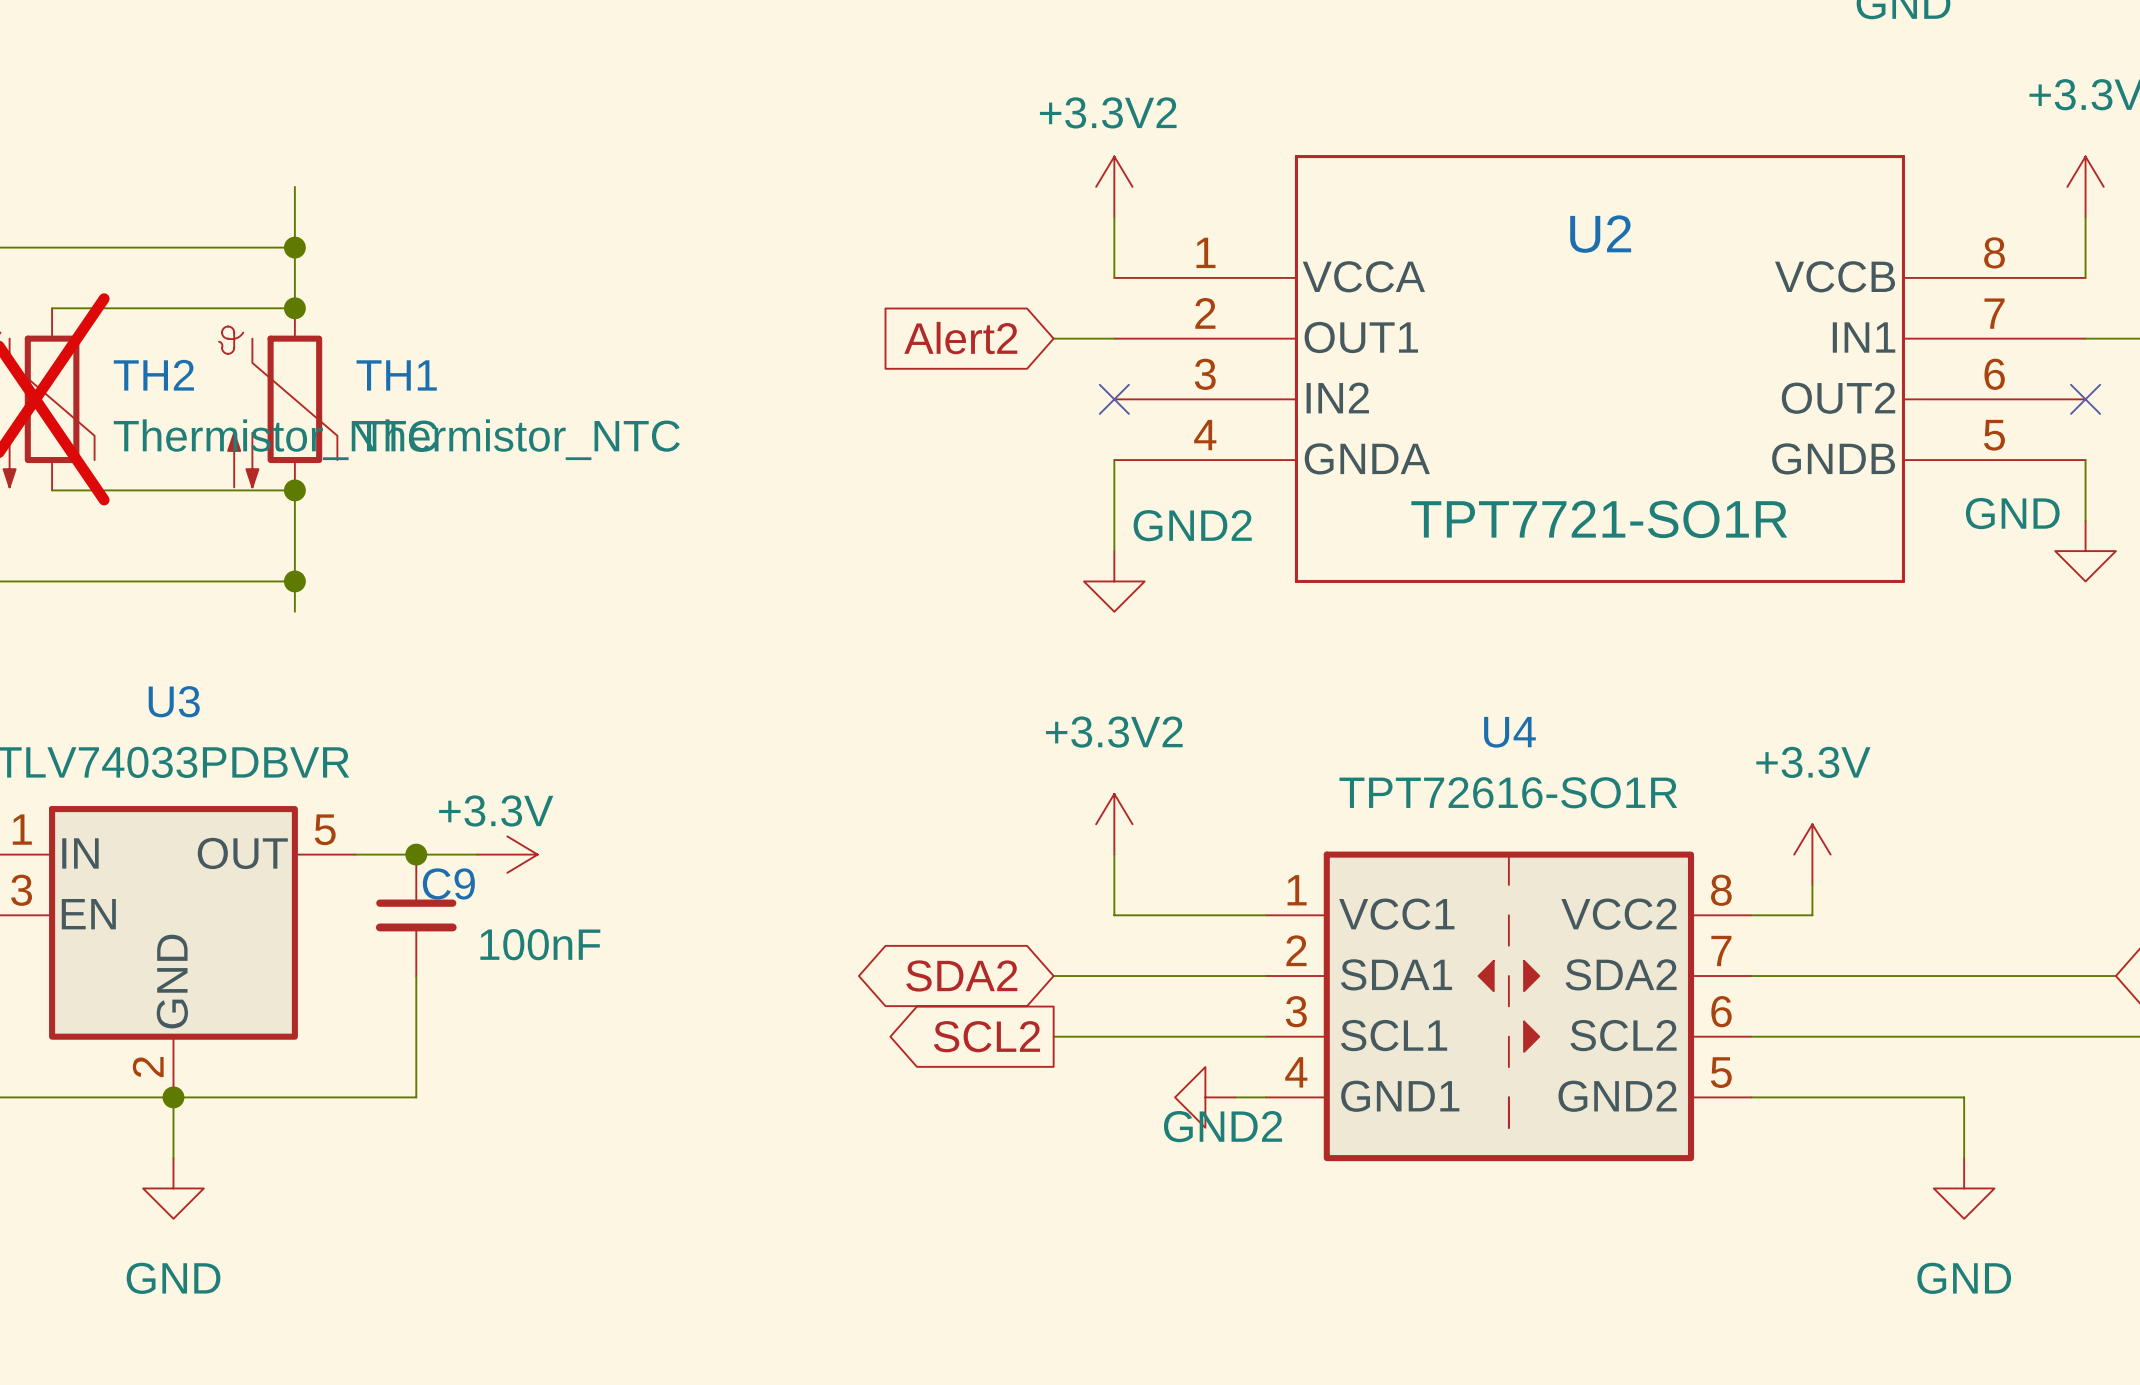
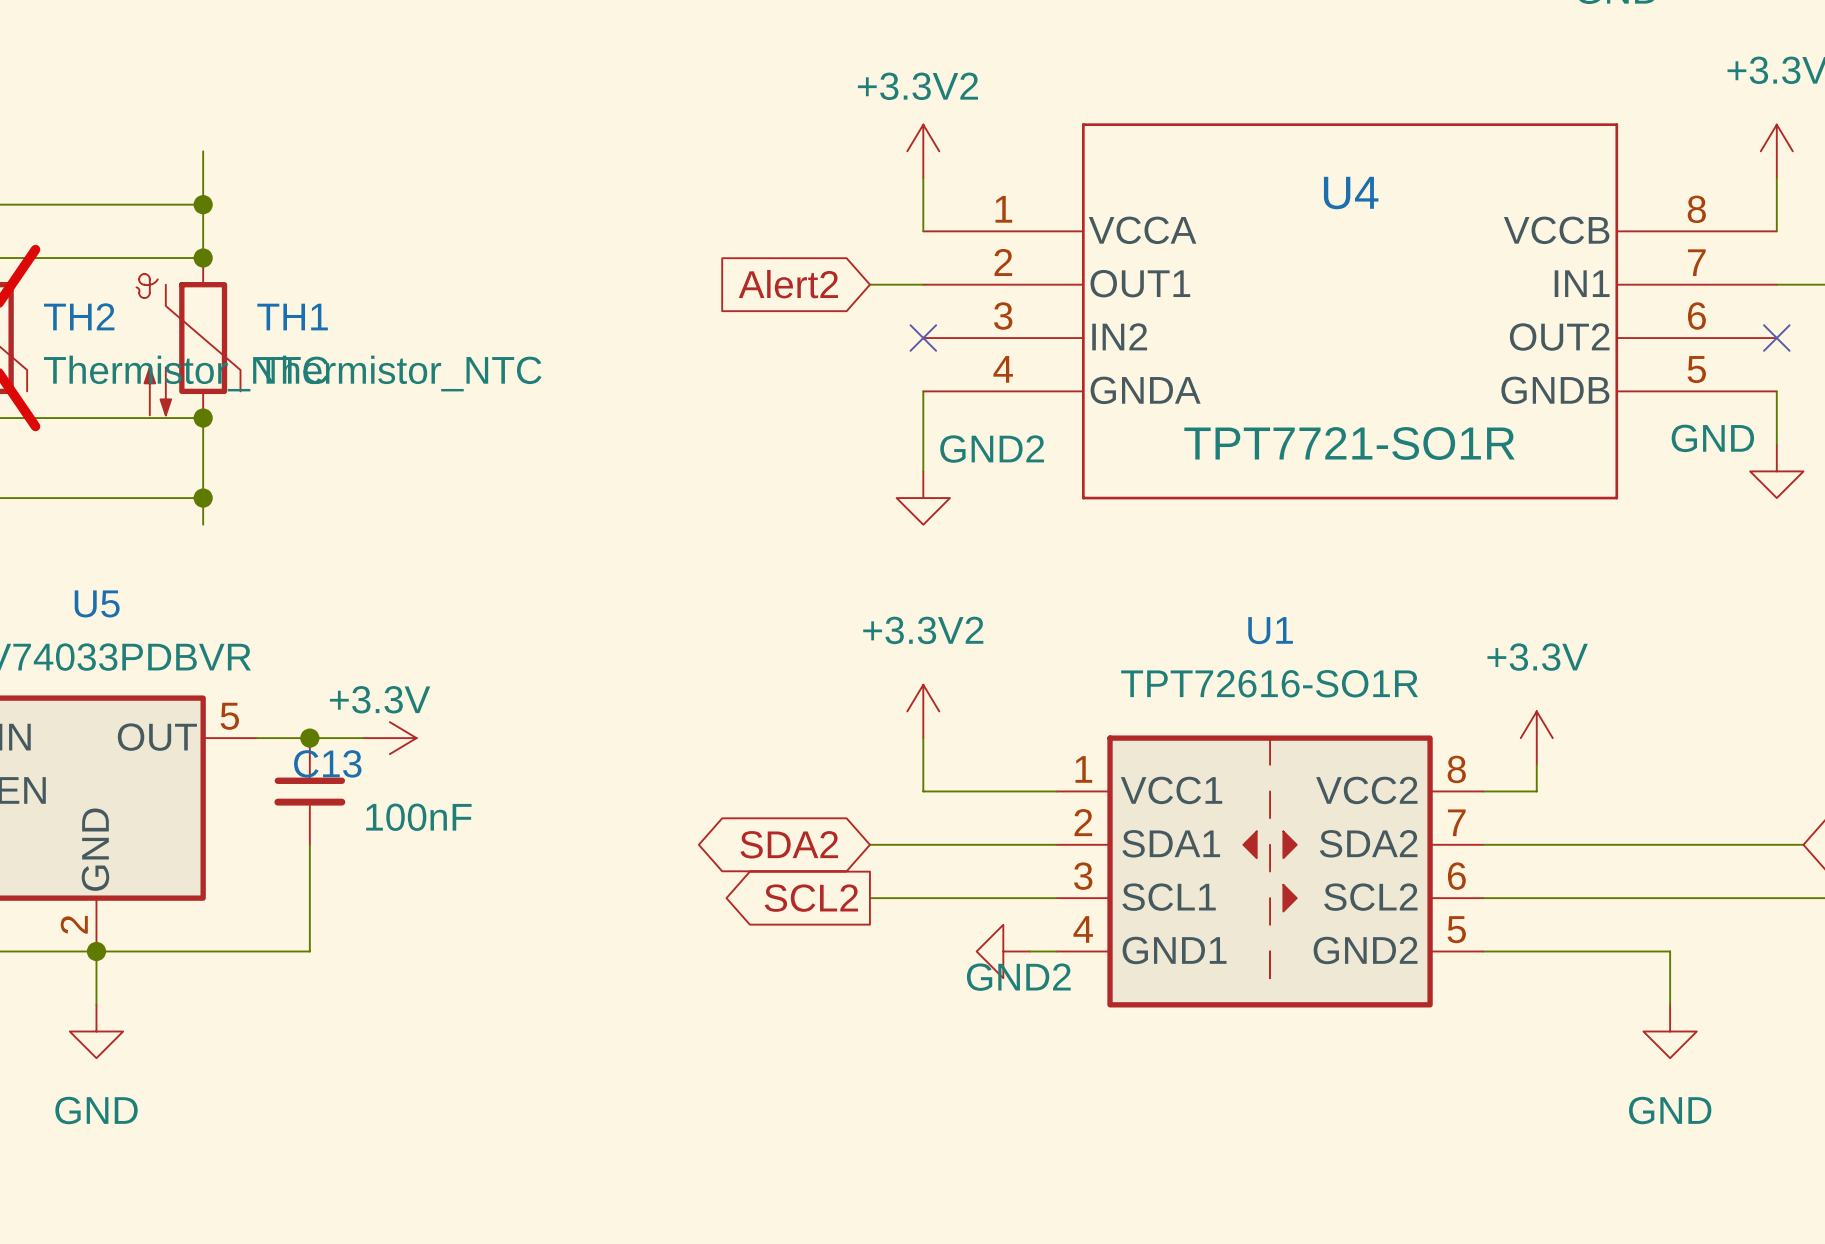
U2 name: U2 (1600, 234) -> U4 (1351, 193)
U3 name: U3 (174, 701) -> U5 (97, 603)
U4 name: U4 (1509, 732) -> U1 (1270, 630)
C9 name: C9 (448, 883) -> C13 (327, 763)

